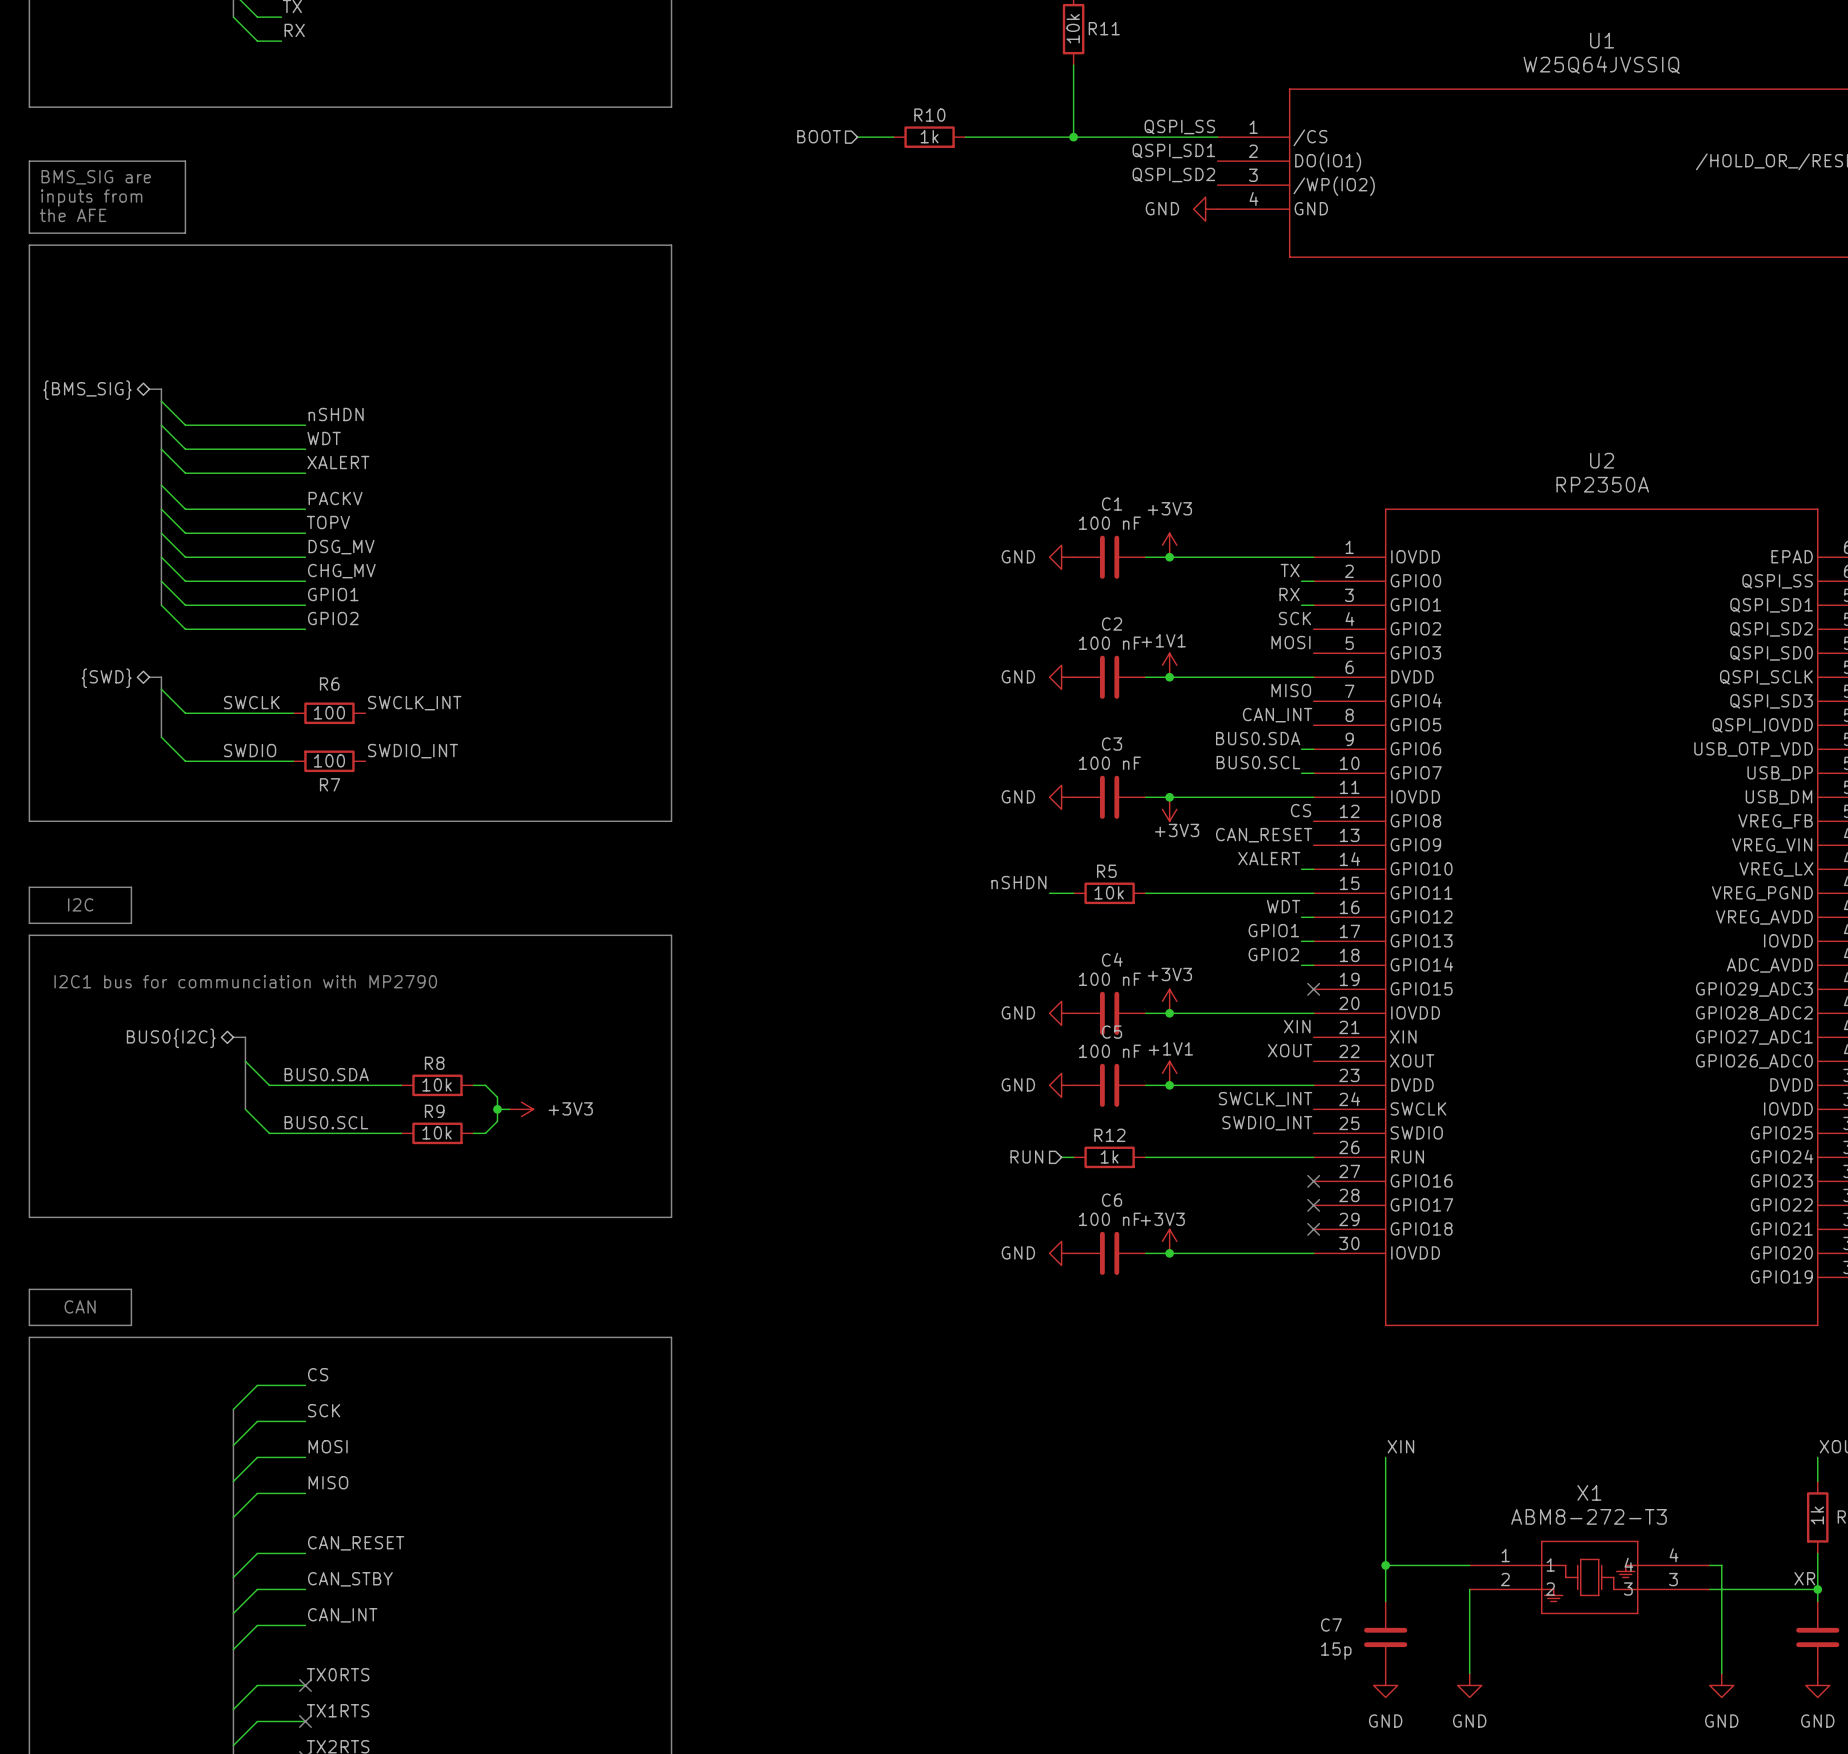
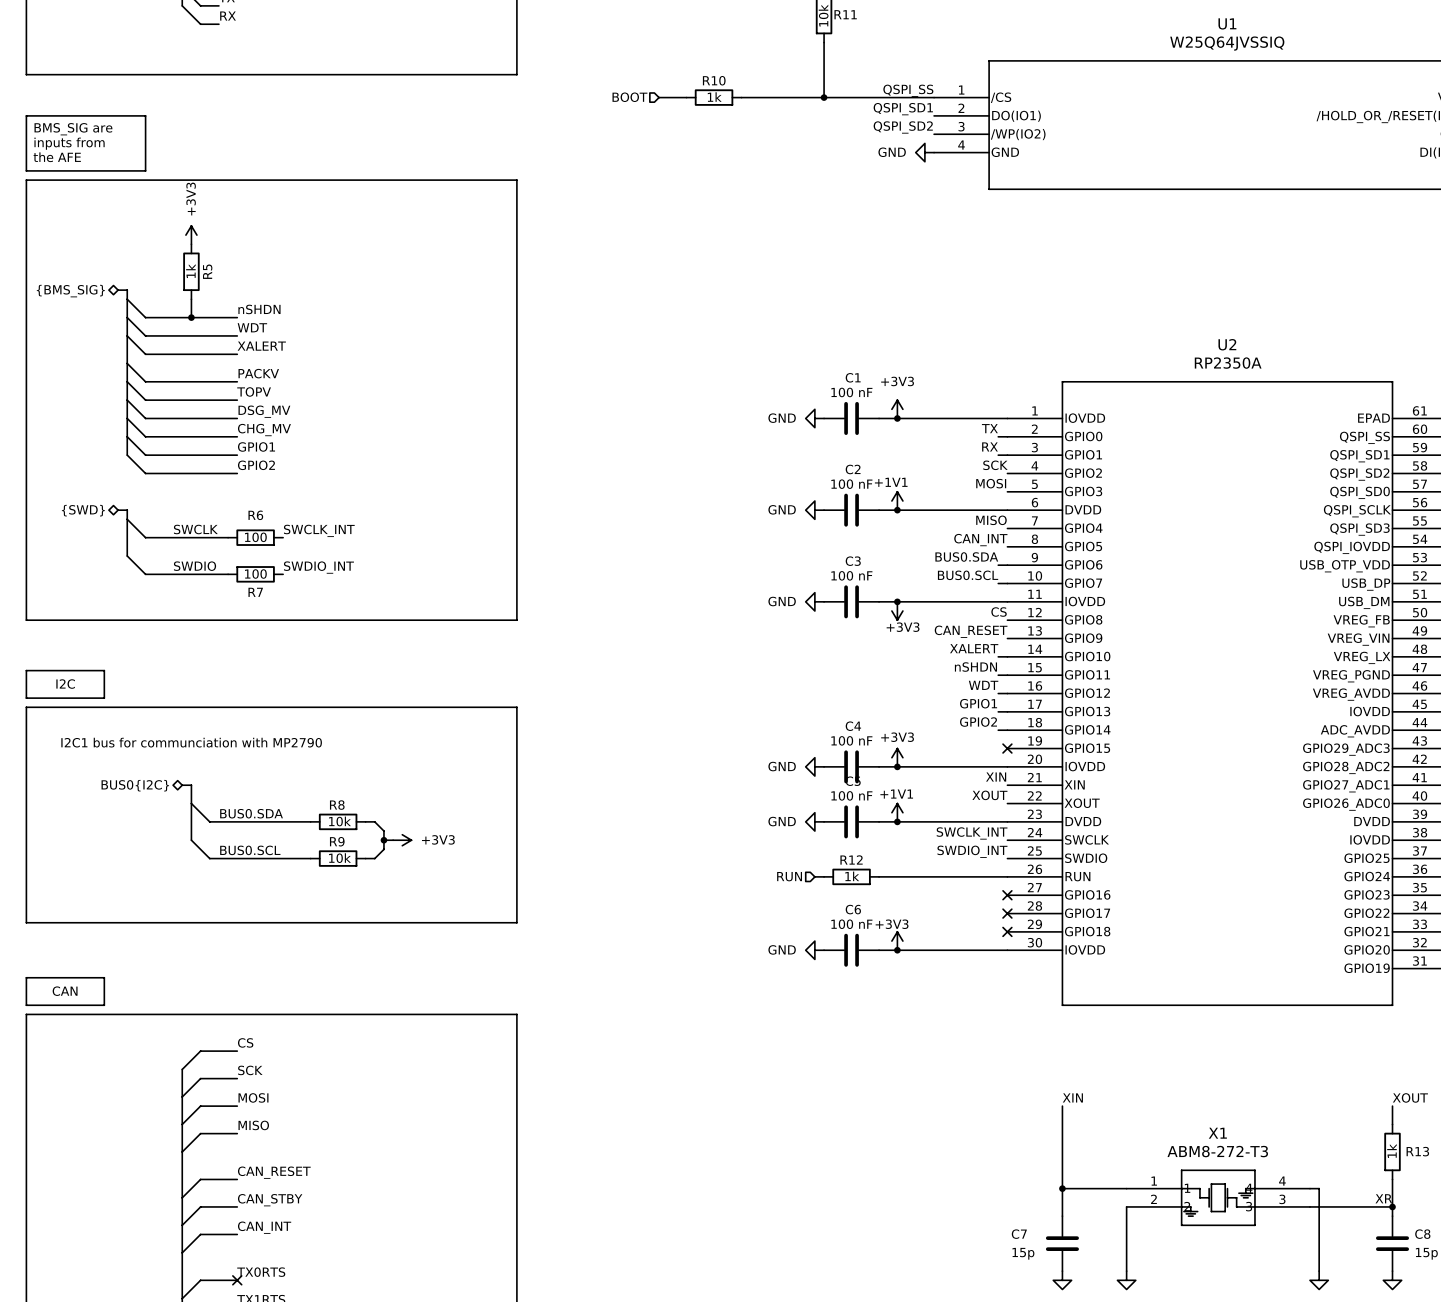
power symbol: none -> +3V3 (191, 235)
wire: none -> (191, 299) (191, 317)
junction: none -> (191, 317)
label: nSHDN (1018, 882) -> none
label: none -> nSHDN (975, 667)
R5 value: 10k (1109, 892) -> 1k (190, 271)
wire: (1049, 893) (1073, 893) -> none
R5 rotation: 0° (1109, 893) -> 90° clockwise (191, 271)
R5 position: (1109, 893) -> (191, 271)
wire: (1145, 893) (1301, 893) -> none

